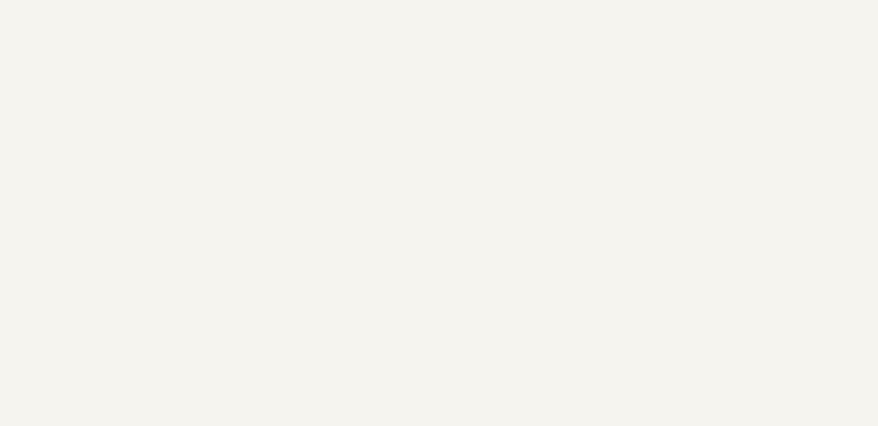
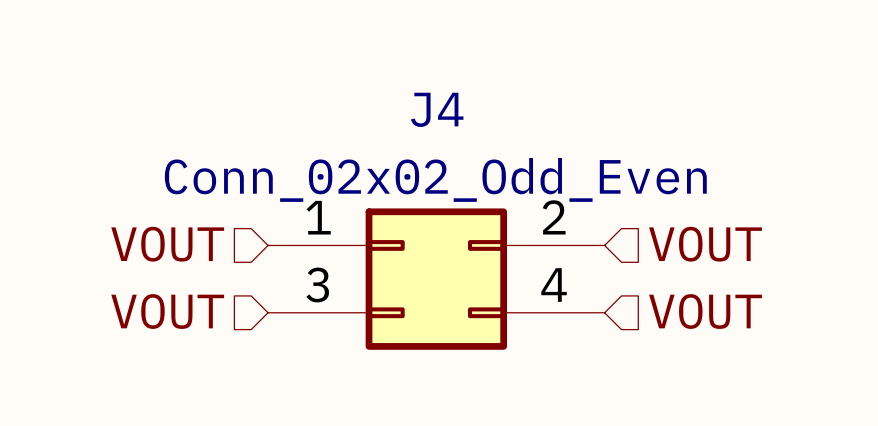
hierarchical label: none -> VOUT (167, 244)
hierarchical label: none -> VOUT (705, 244)
J4: none -> Conn_02x02_Odd_Even (436, 279)
hierarchical label: none -> VOUT (167, 311)
hierarchical label: none -> VOUT (705, 311)

